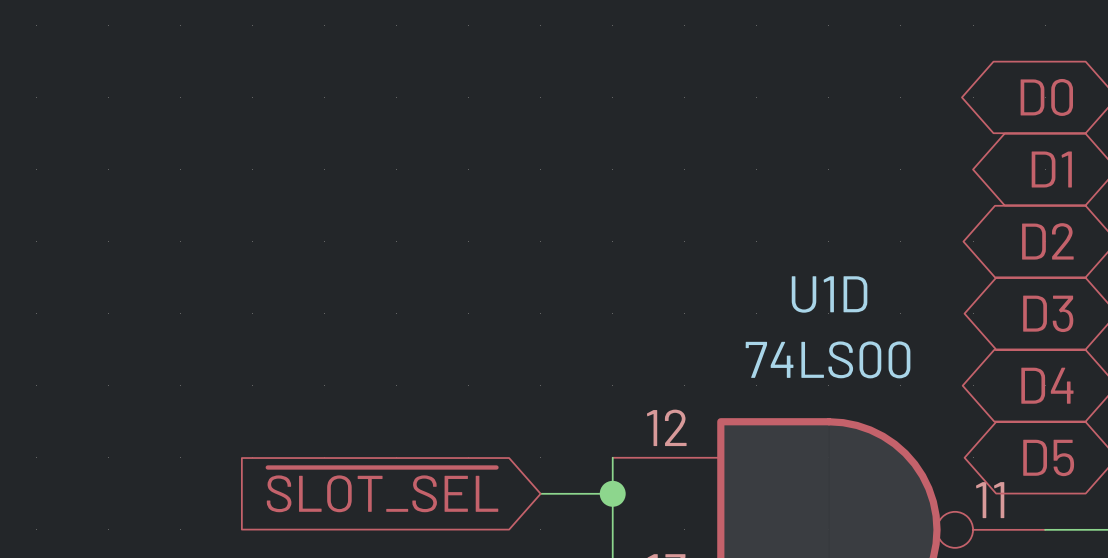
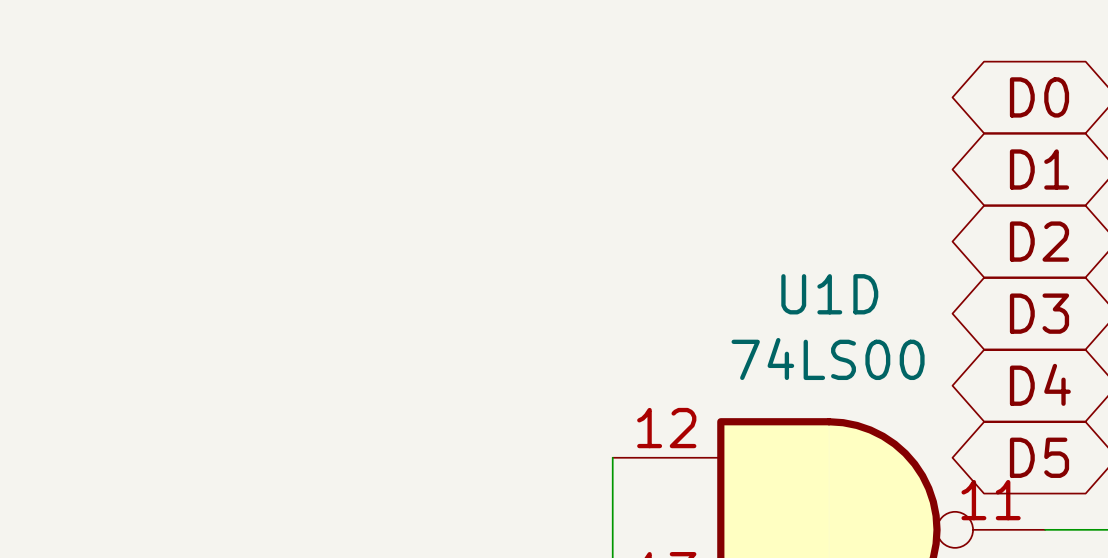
global label: ~{SLOT_SEL} (382, 489) -> none
wire: (540, 493) (612, 493) -> none
junction: (612, 493) -> none

